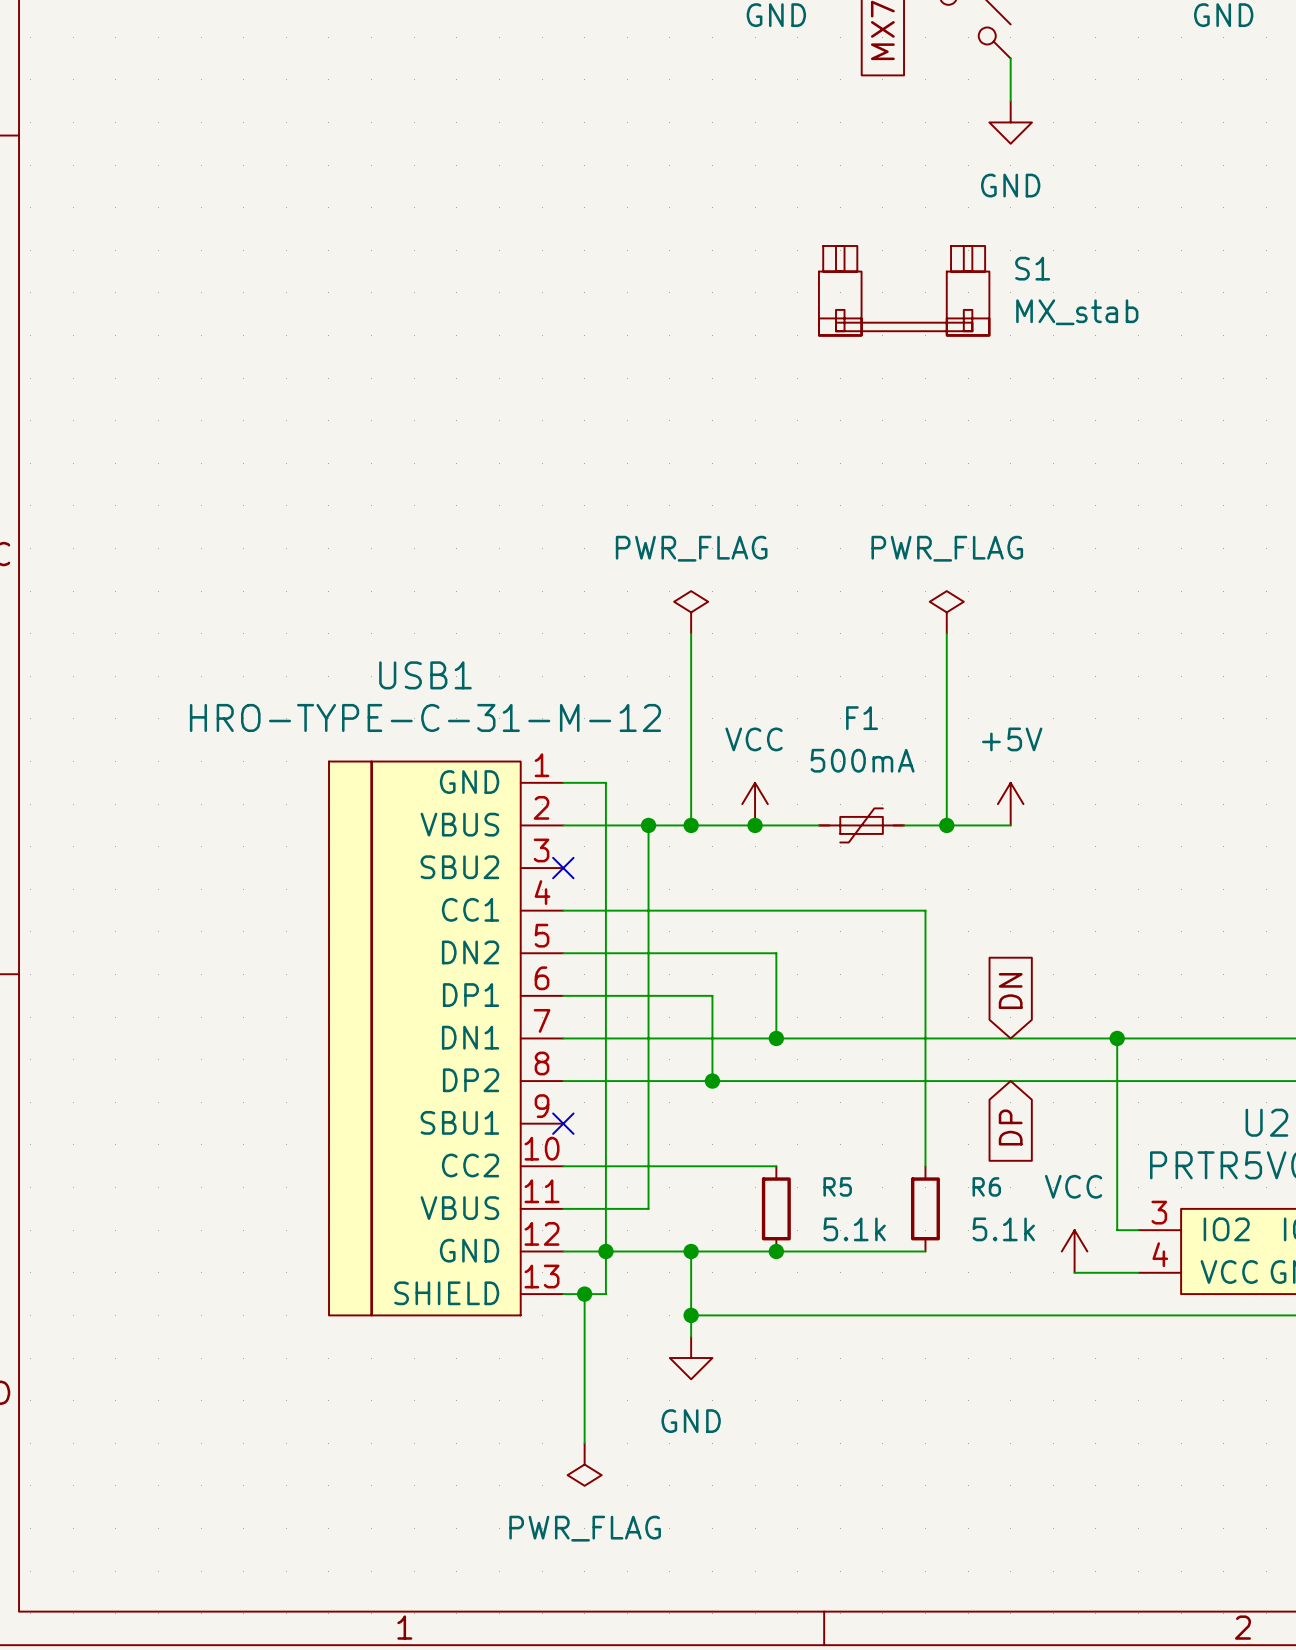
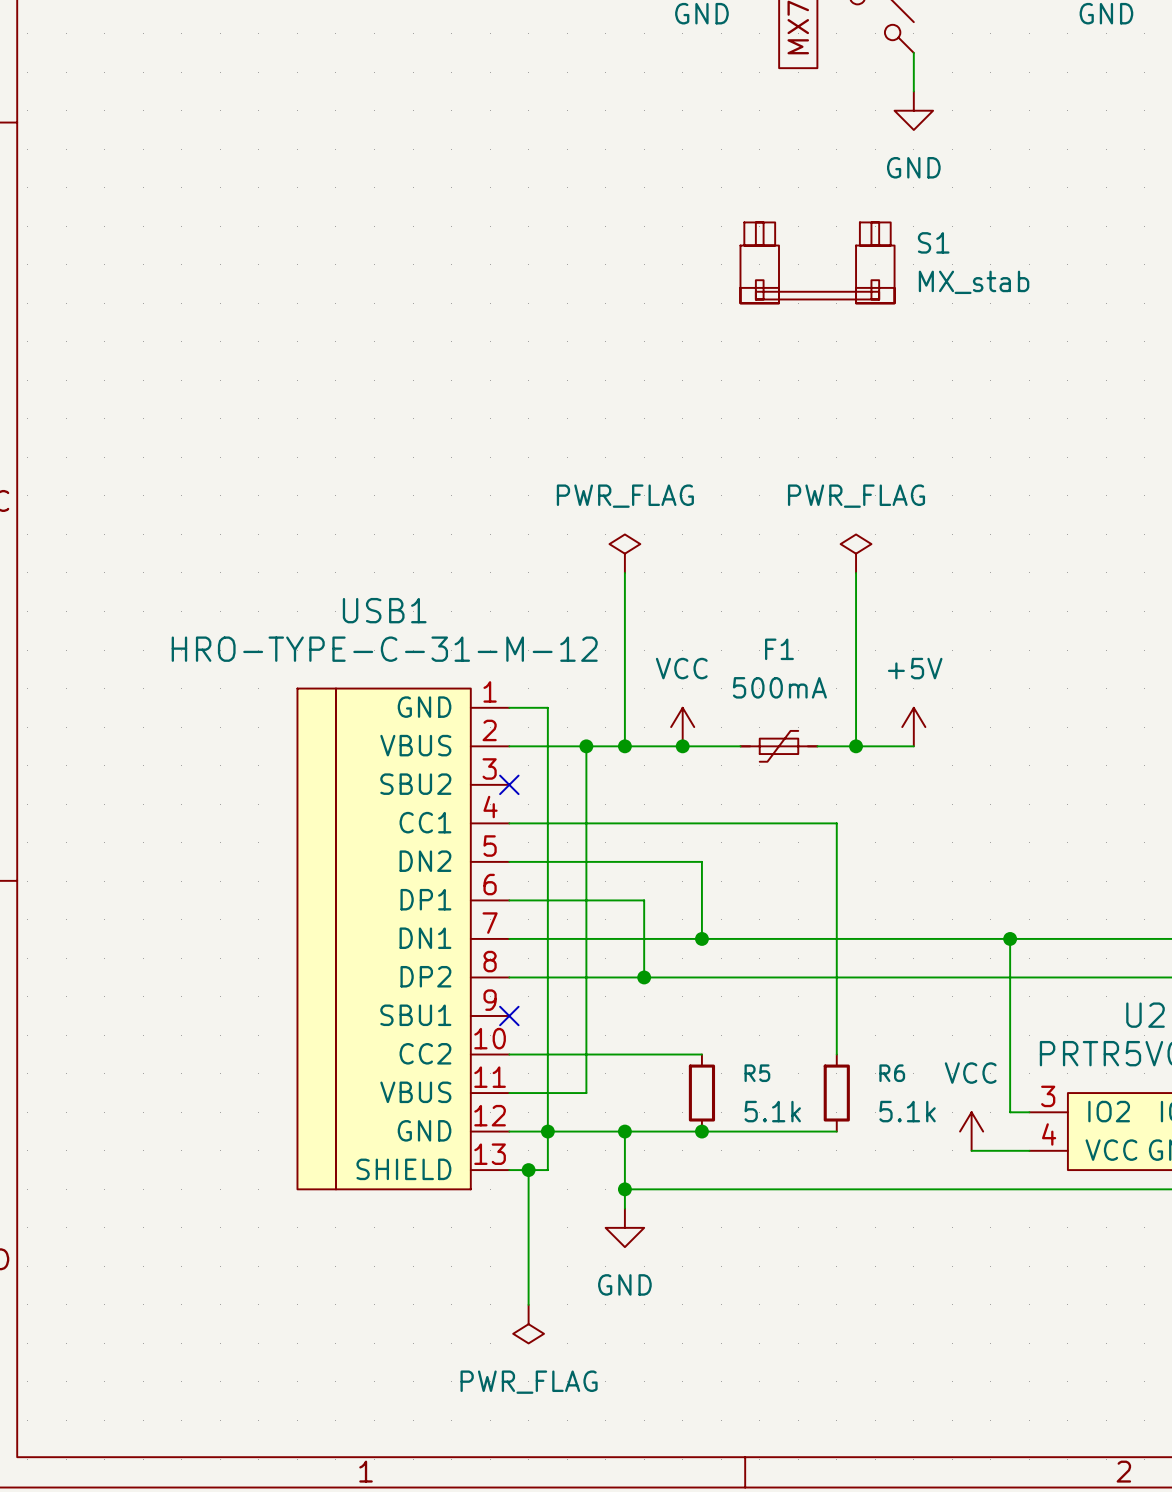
global label: DN (1010, 991) -> none
global label: DP (1010, 1127) -> none

